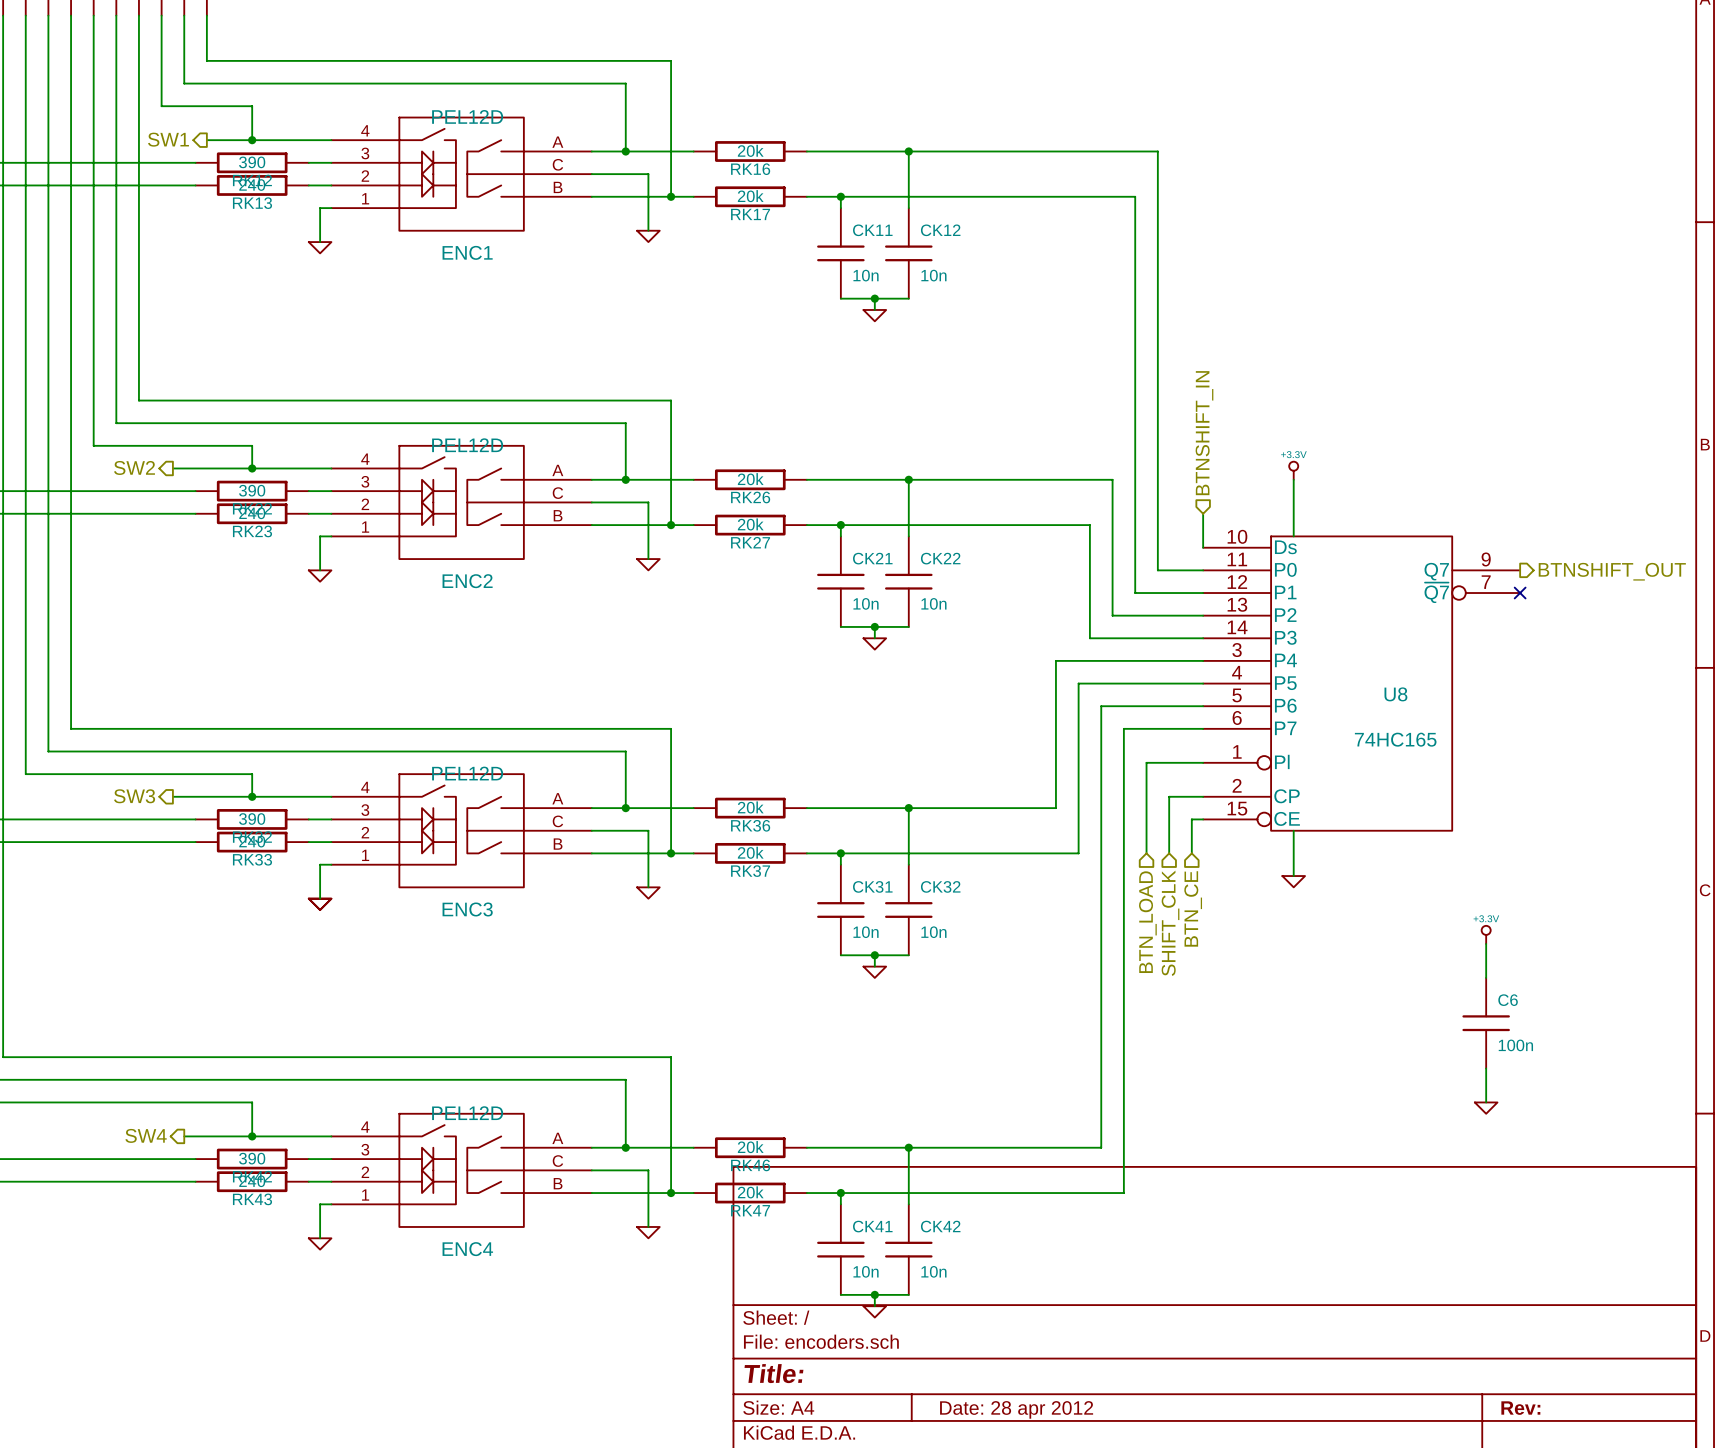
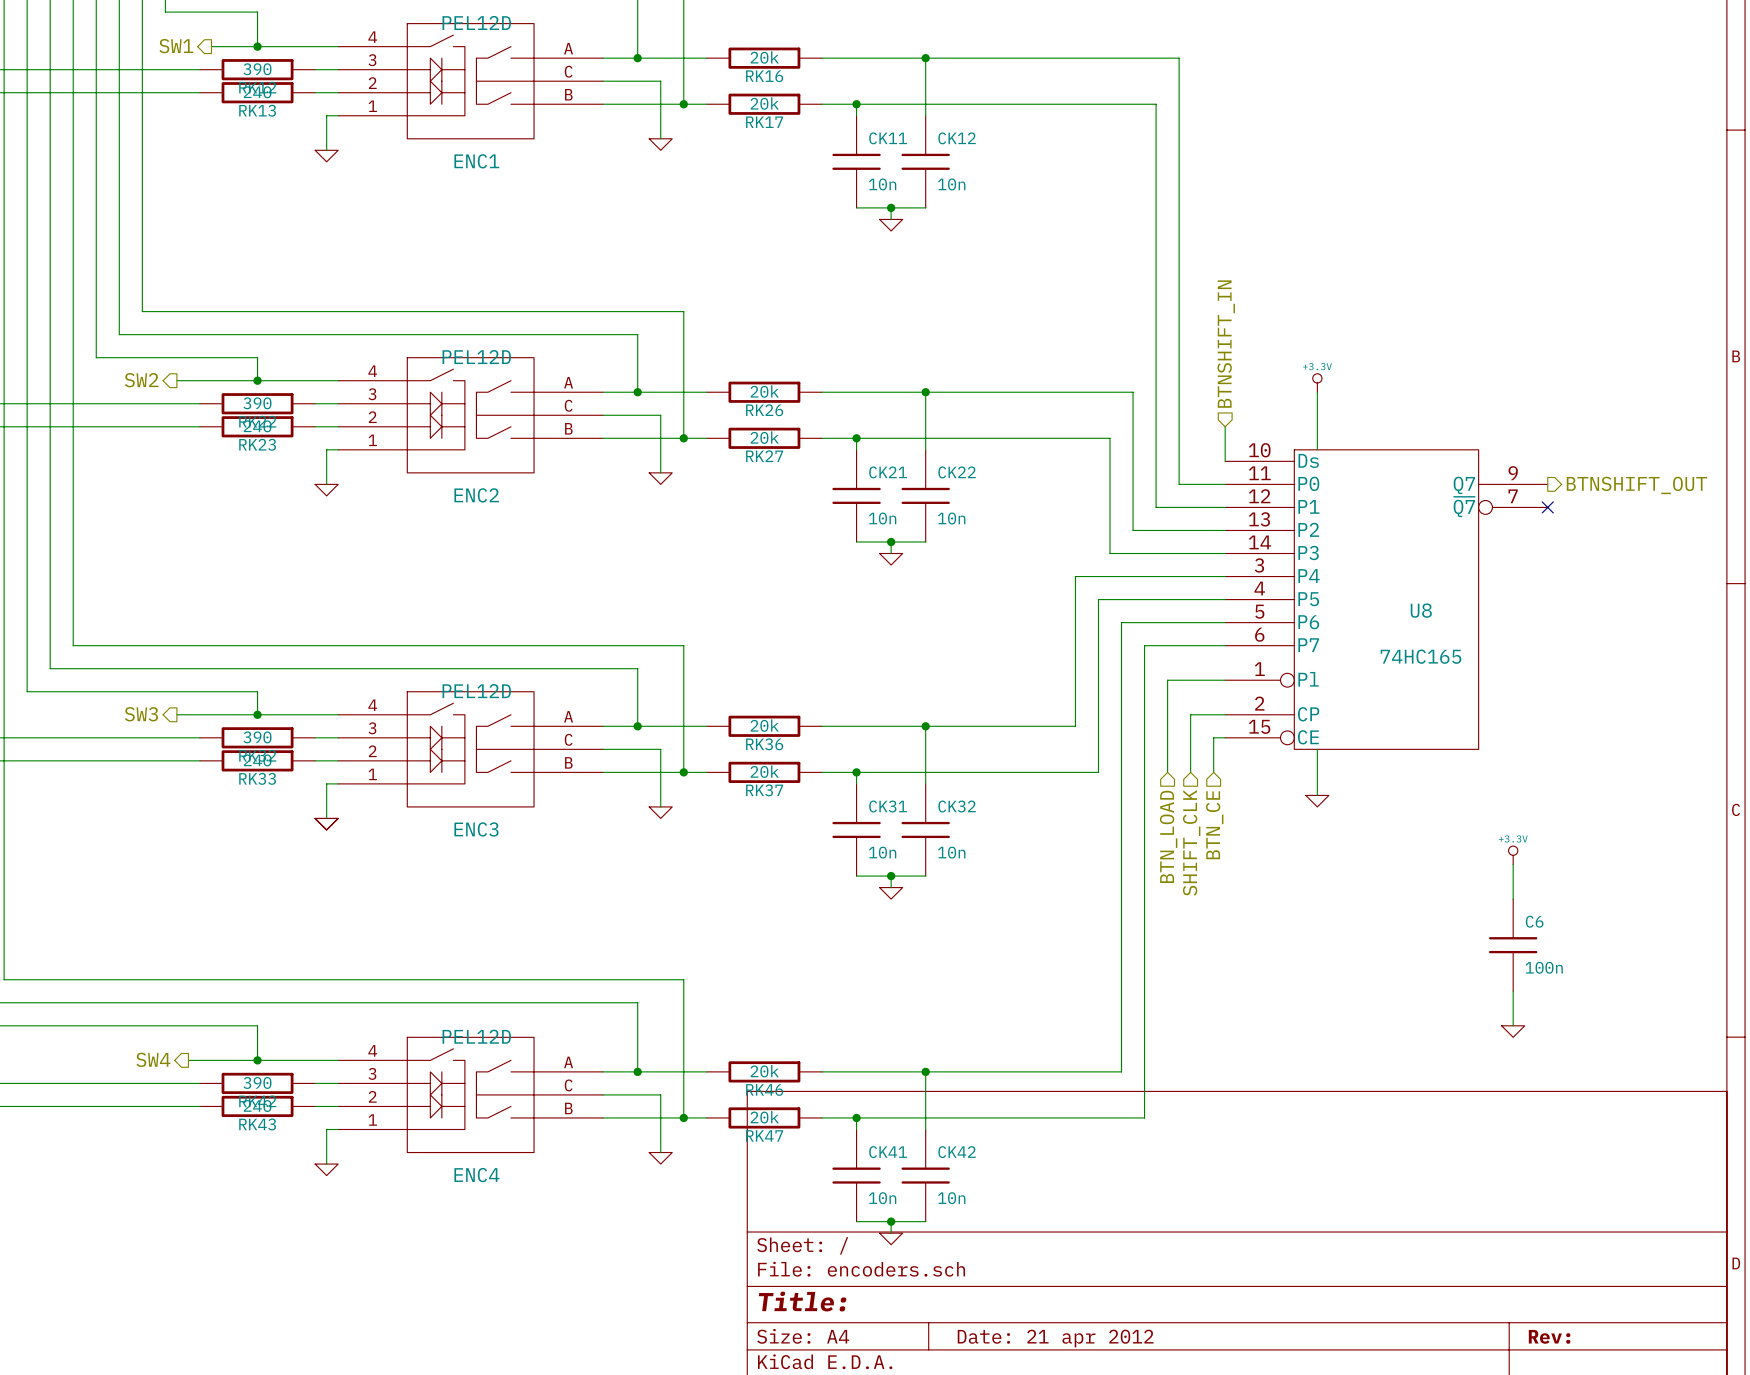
title block: Date: 28 apr 2012 (1016, 1409) -> Date: 21 apr 2012 (1055, 1338)

